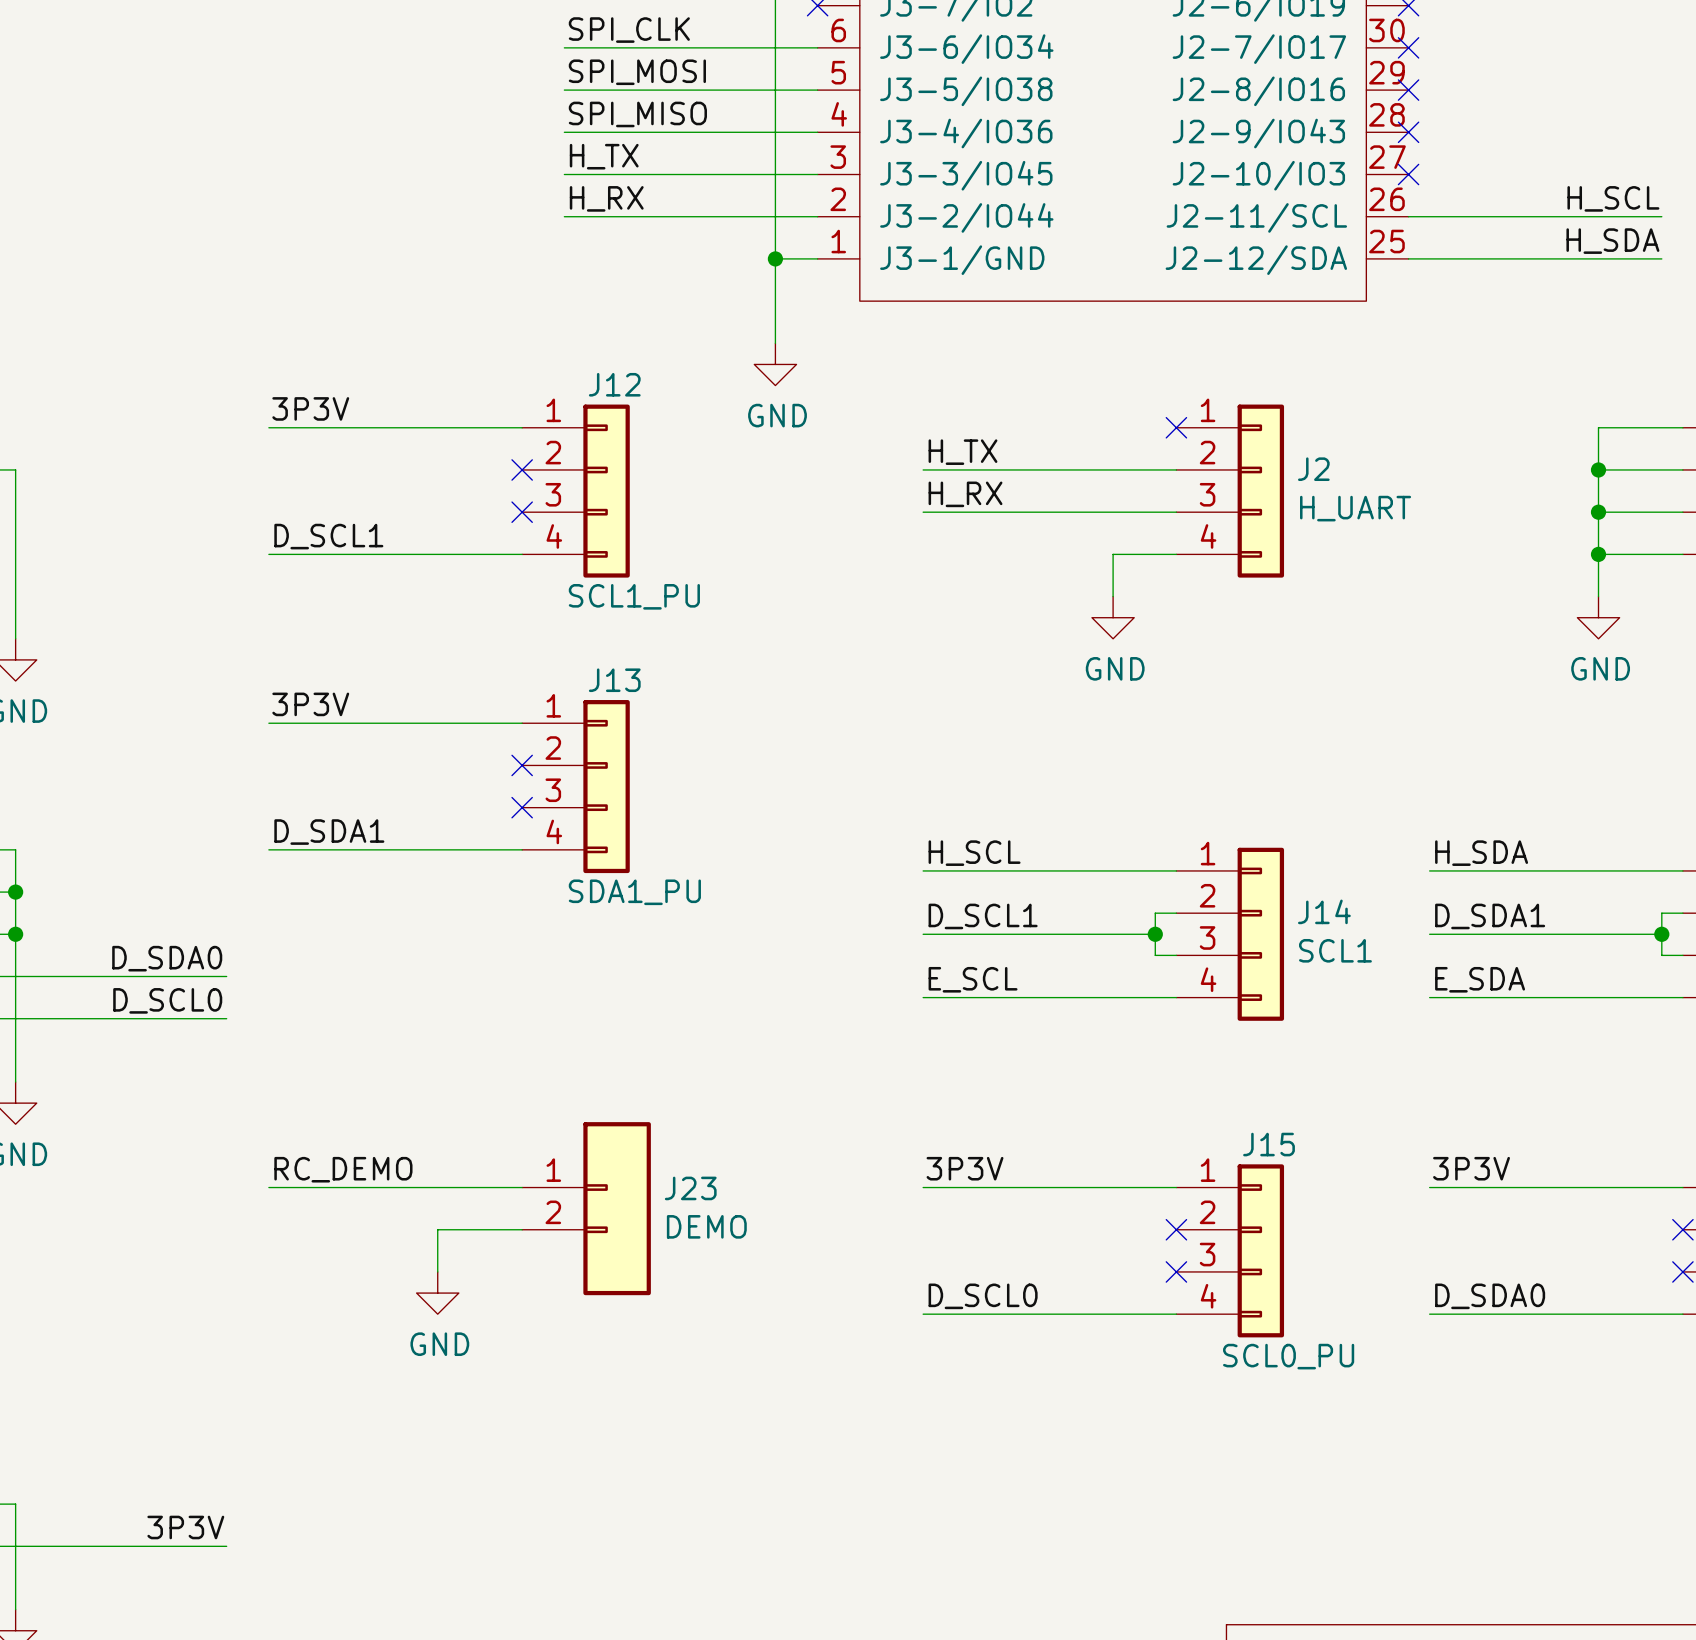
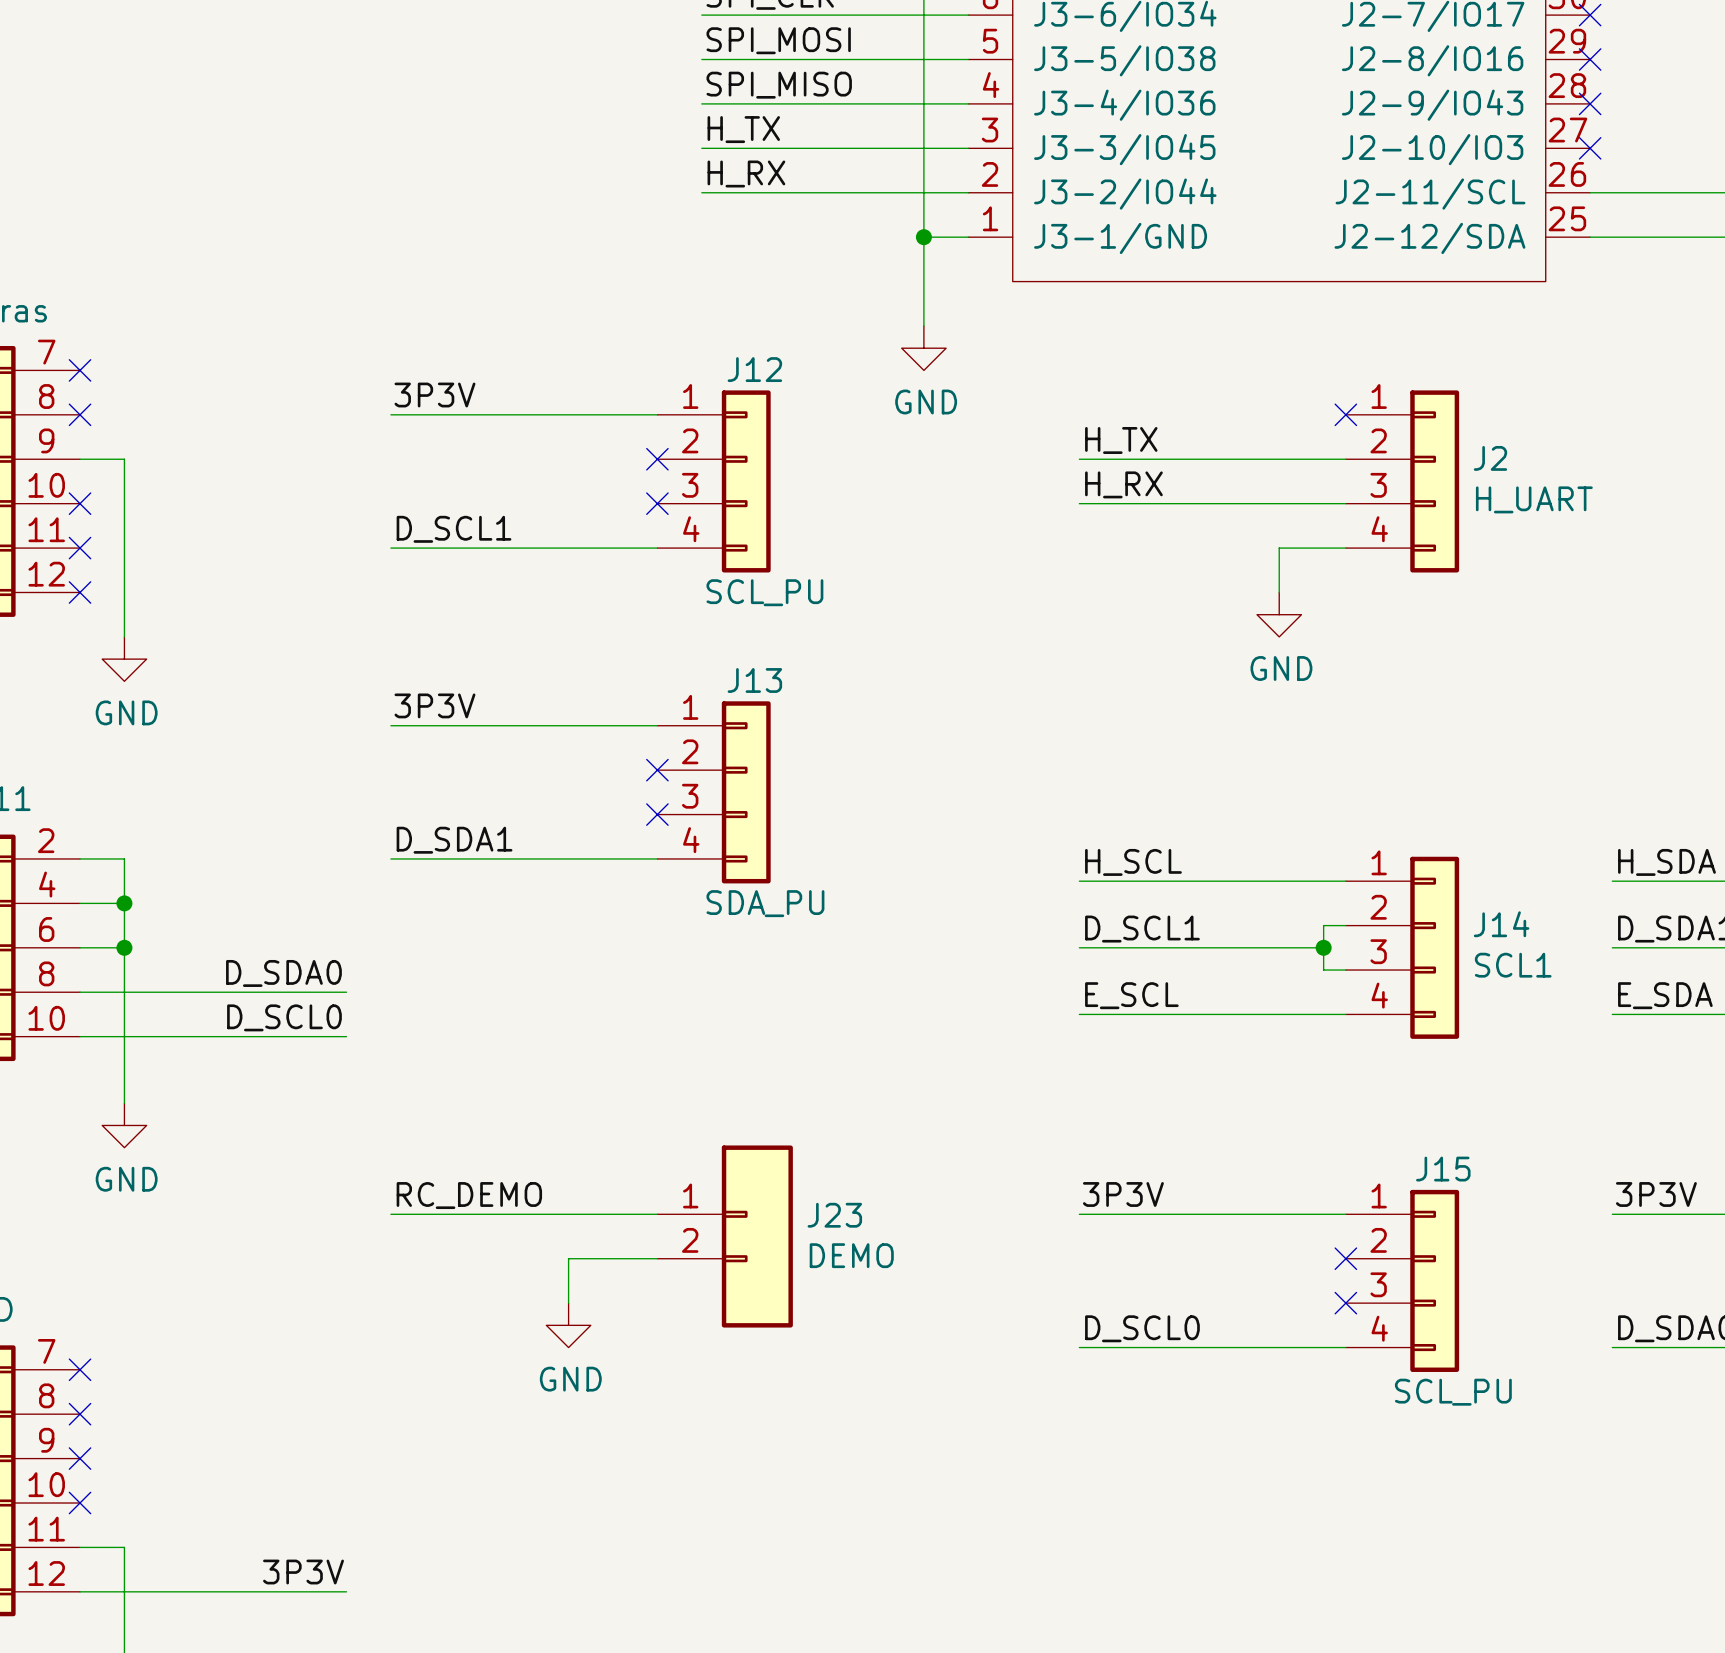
J12 value: SCL1_PU (634, 596) -> SCL_PU (764, 592)
J13 value: SDA1_PU (634, 892) -> SDA_PU (765, 903)
J15 value: SCL0_PU (1288, 1356) -> SCL_PU (1453, 1392)

